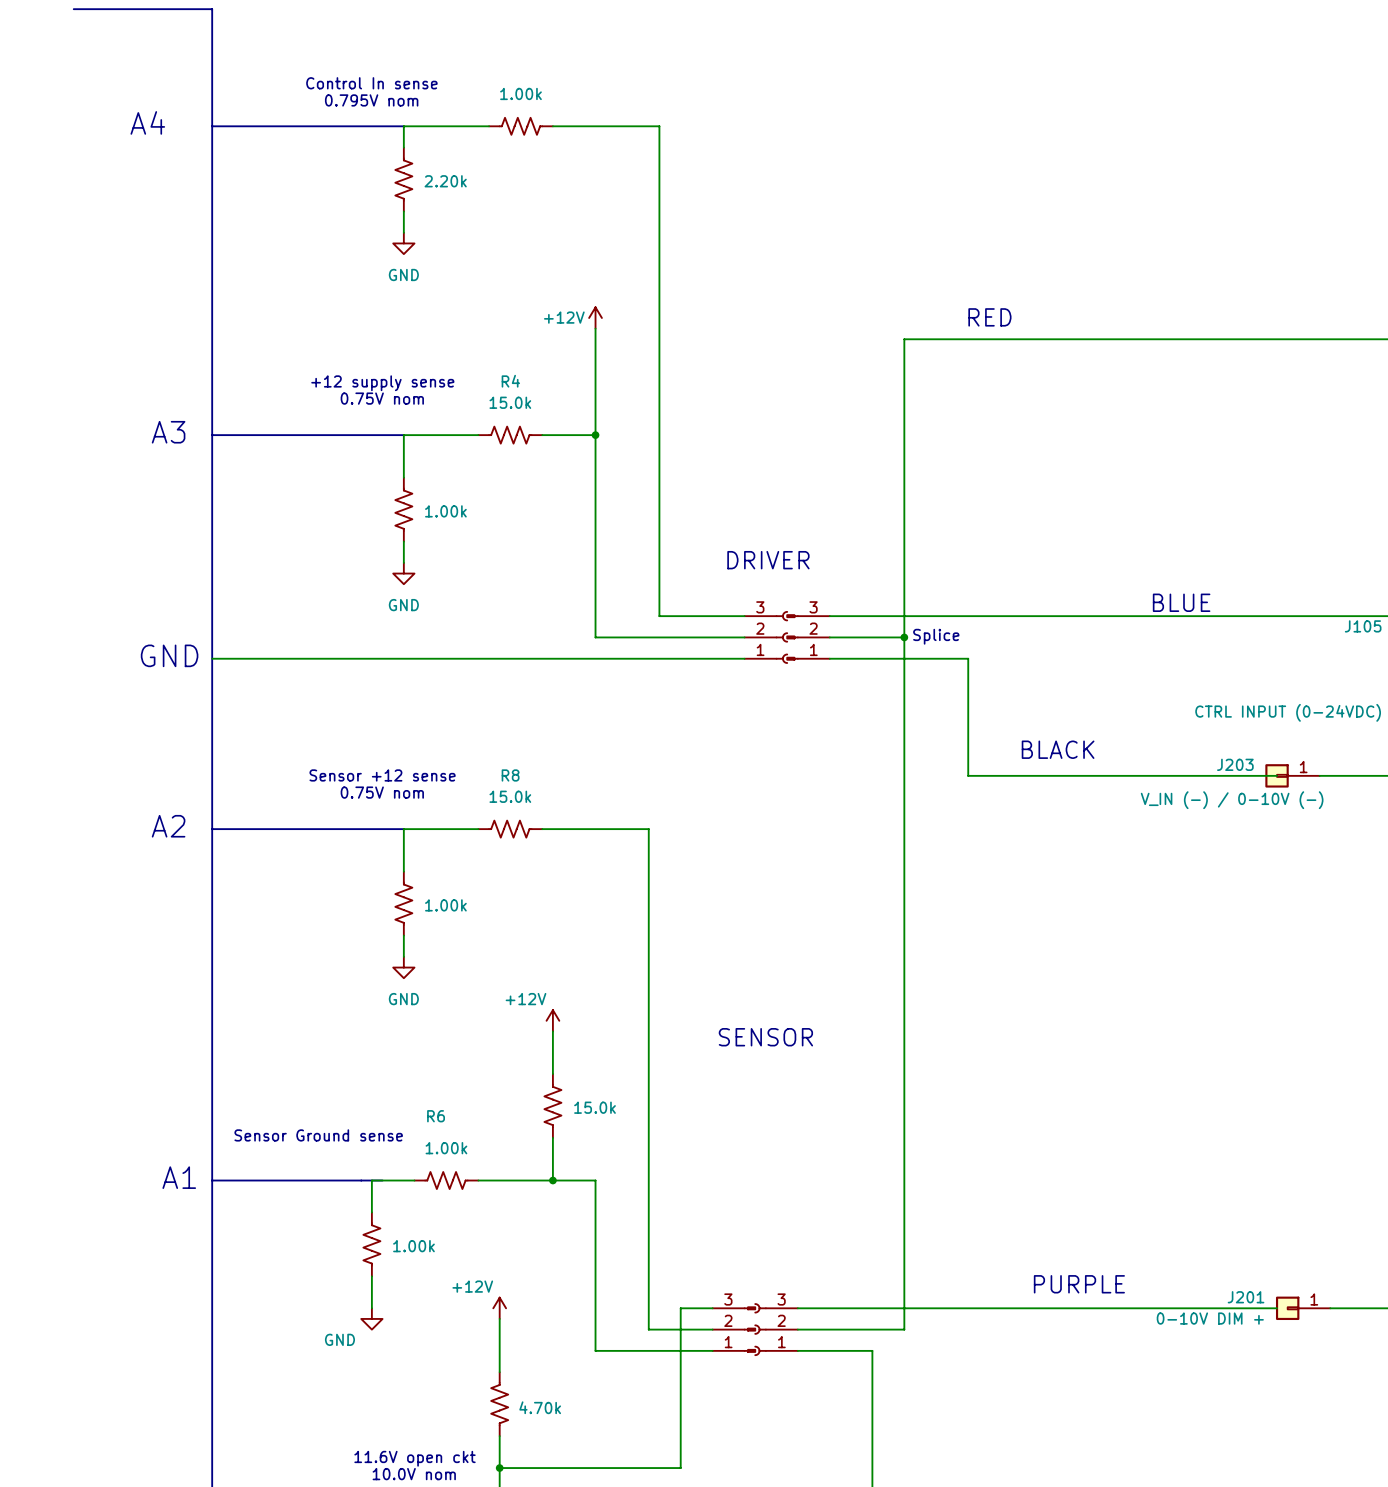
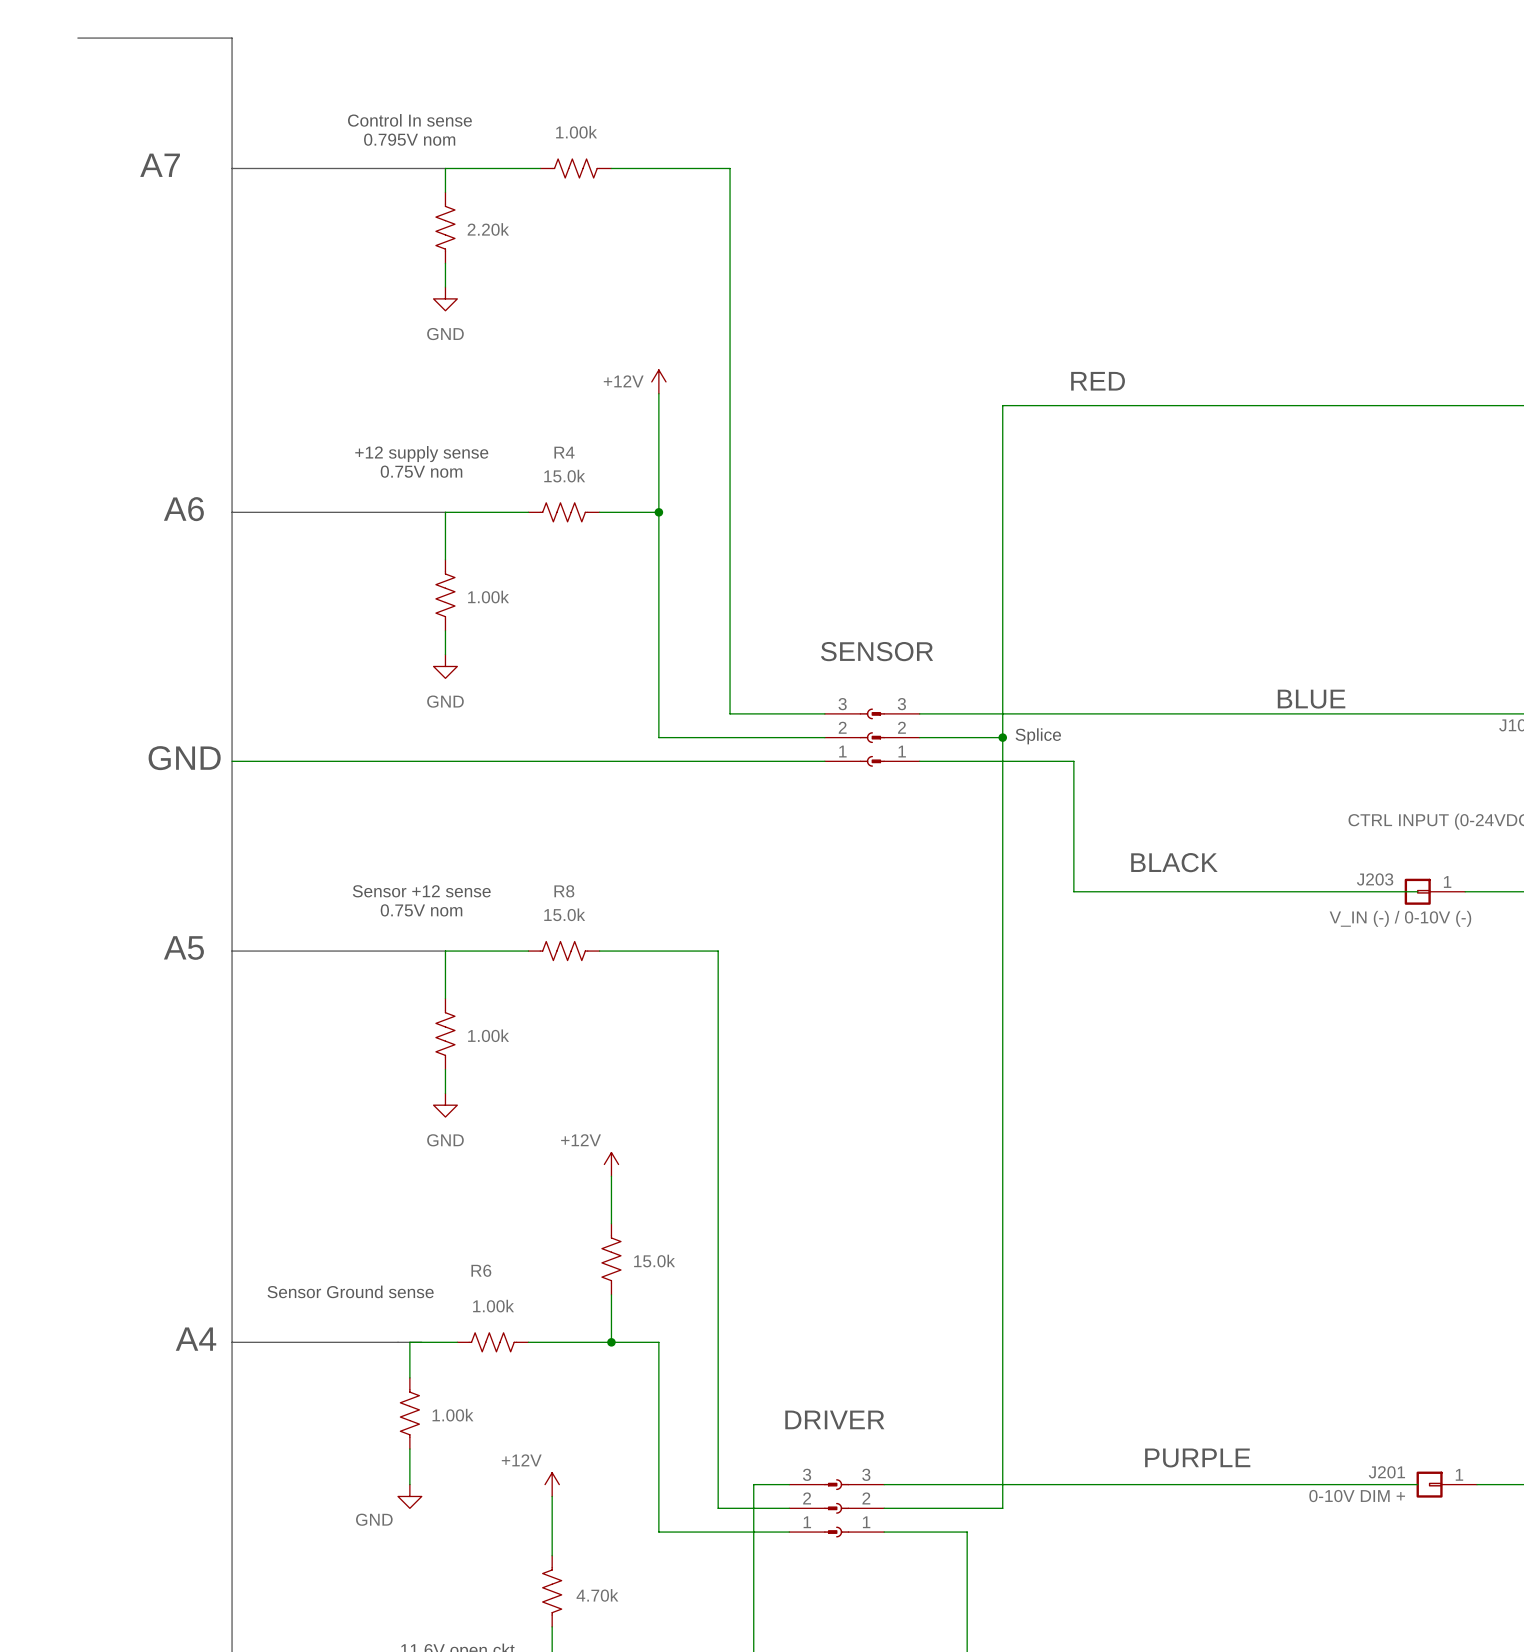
text: A4 (147, 122) -> A7 (160, 165)
text: A3 (168, 432) -> A6 (183, 509)
text: DRIVER (768, 560) -> none
text: none -> SENSOR (877, 651)
text: A2 (168, 826) -> A5 (183, 948)
text: SENSOR (765, 1037) -> none
text: A1 (179, 1177) -> A4 (196, 1339)
text: none -> DRIVER (834, 1419)

